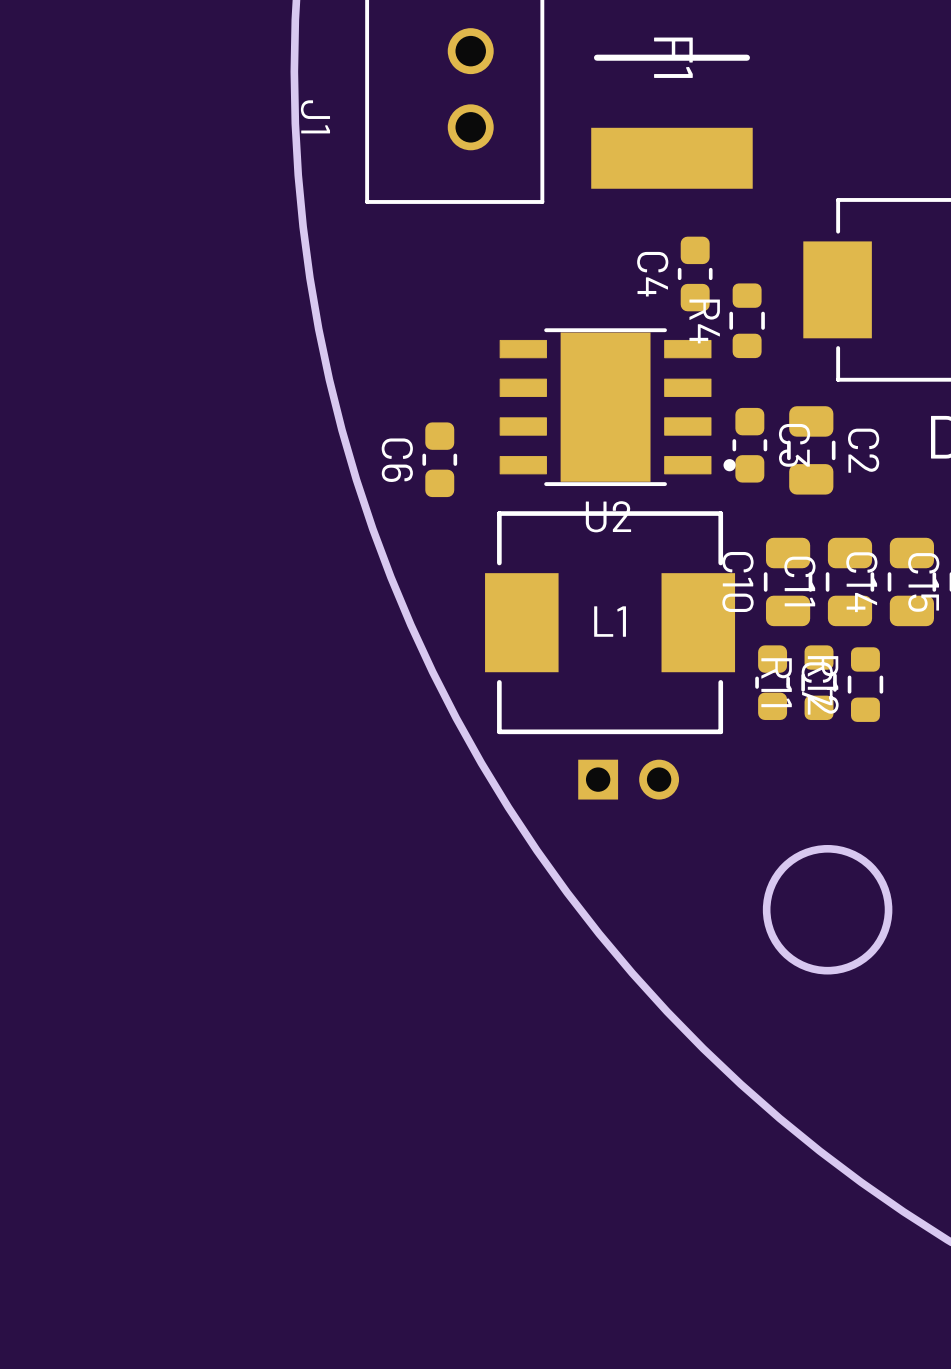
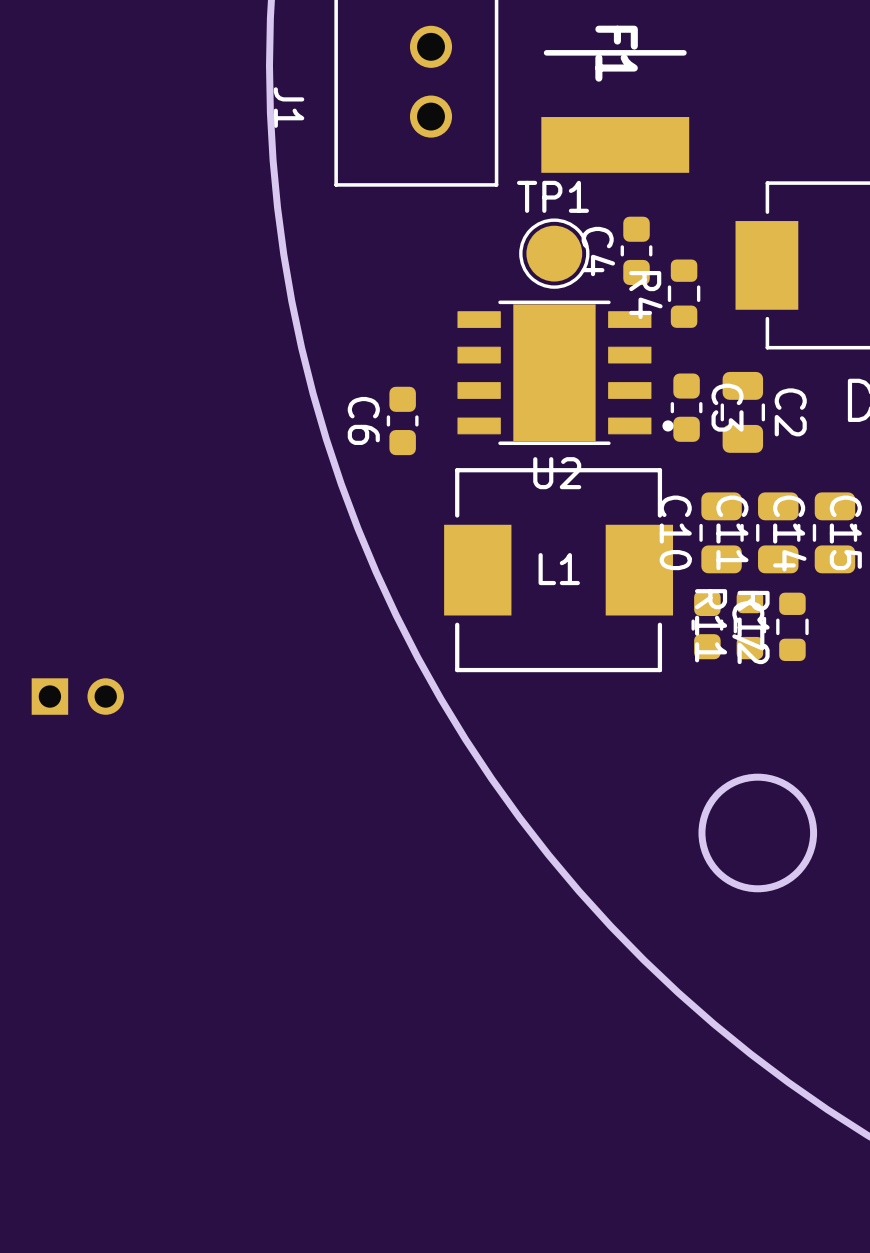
TP1: none -> (554, 253)
part position: (628, 779) -> (77, 696)

